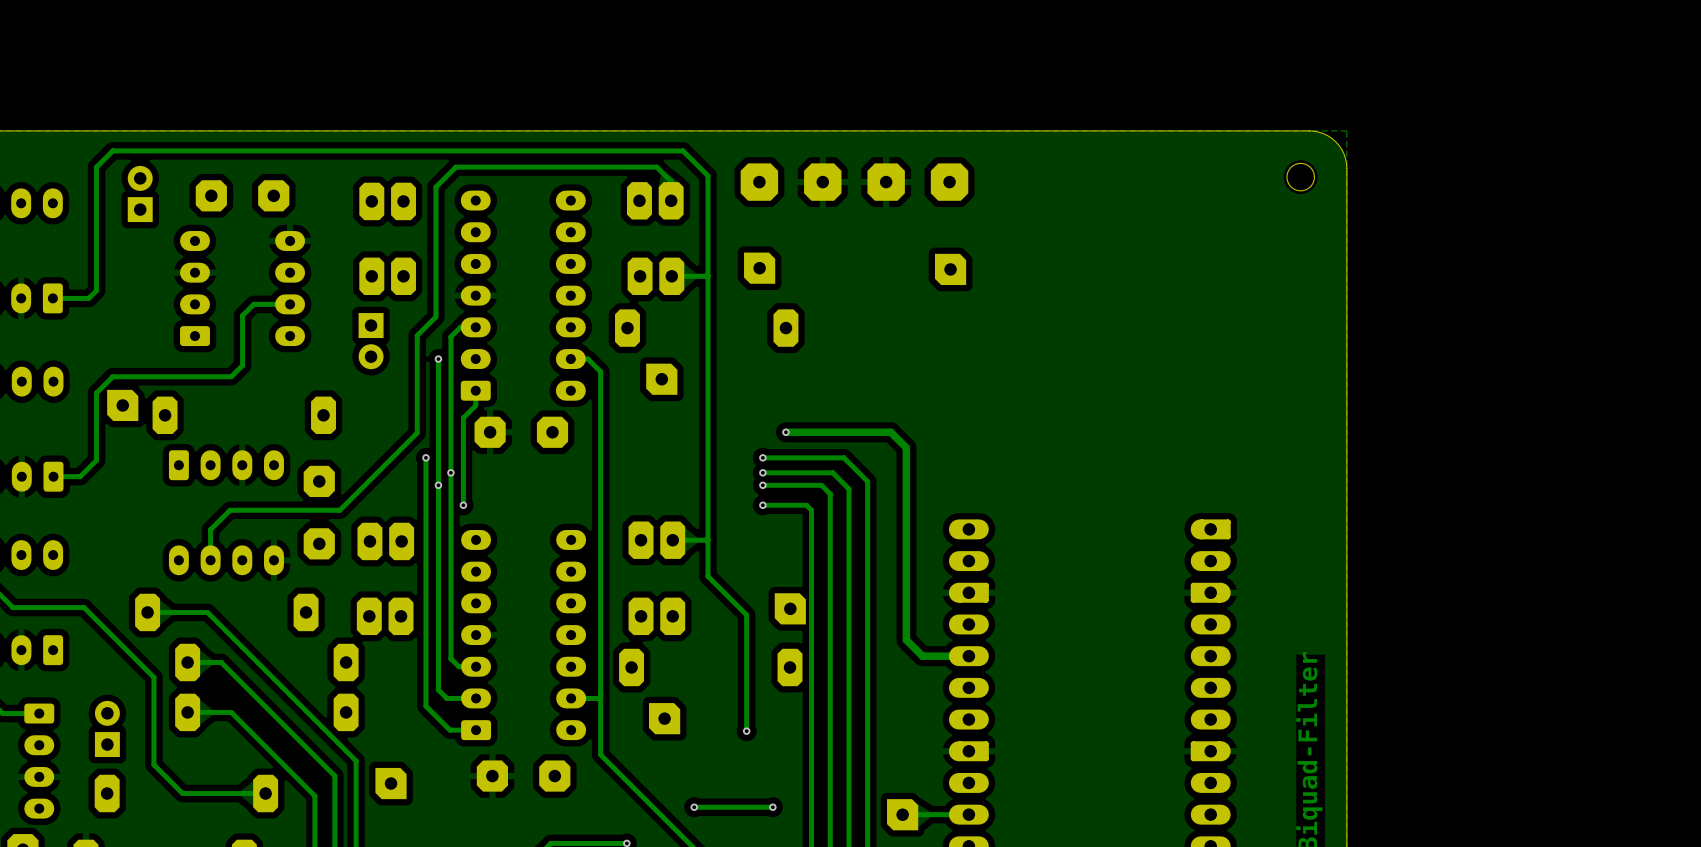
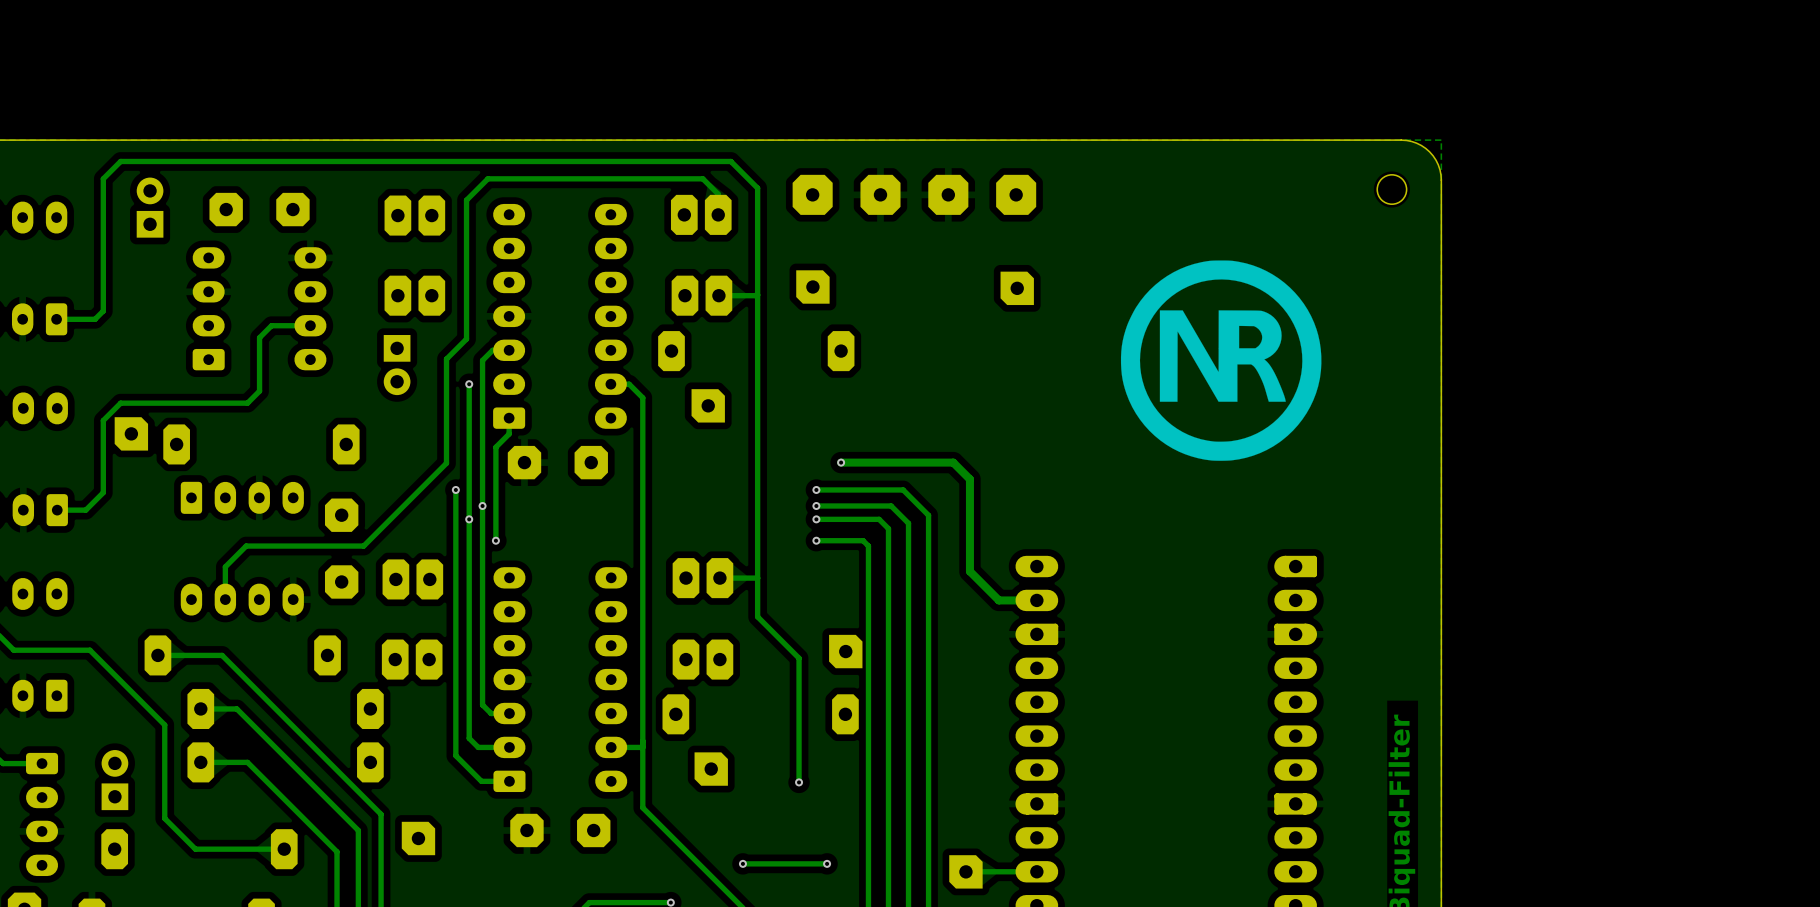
drawing: none -> [1120, 260, 1322, 461]
track: (906, 533) (906, 640) (922, 656) (968, 656) -> (969, 571) (998, 600) (1036, 600)

